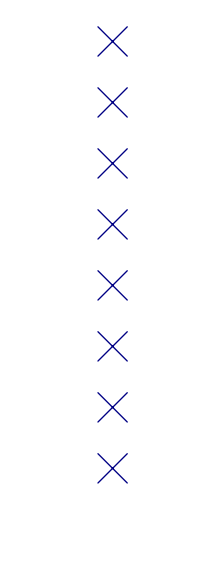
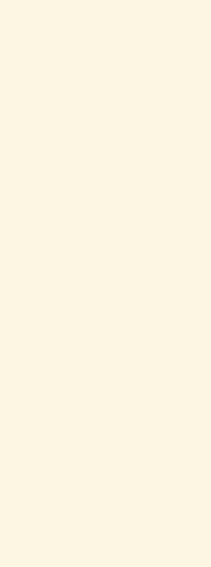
no-connect mark: (112, 41) -> none
no-connect mark: (112, 102) -> none
no-connect mark: (112, 163) -> none
no-connect mark: (112, 224) -> none
no-connect mark: (112, 285) -> none
no-connect mark: (112, 346) -> none
no-connect mark: (112, 407) -> none
no-connect mark: (112, 468) -> none

